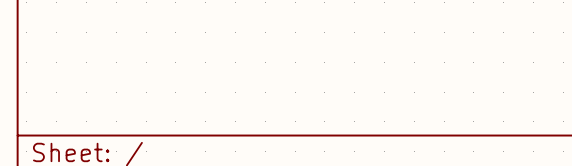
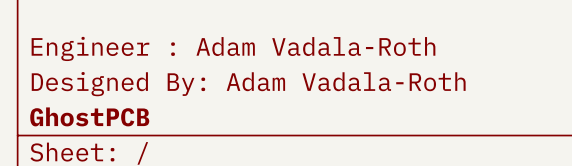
title block: none -> Engineer : Adam Vadala-Roth (233, 48)
title block: none -> Designed By: Adam Vadala-Roth (248, 84)
title block: none -> GhostPCB (89, 116)

